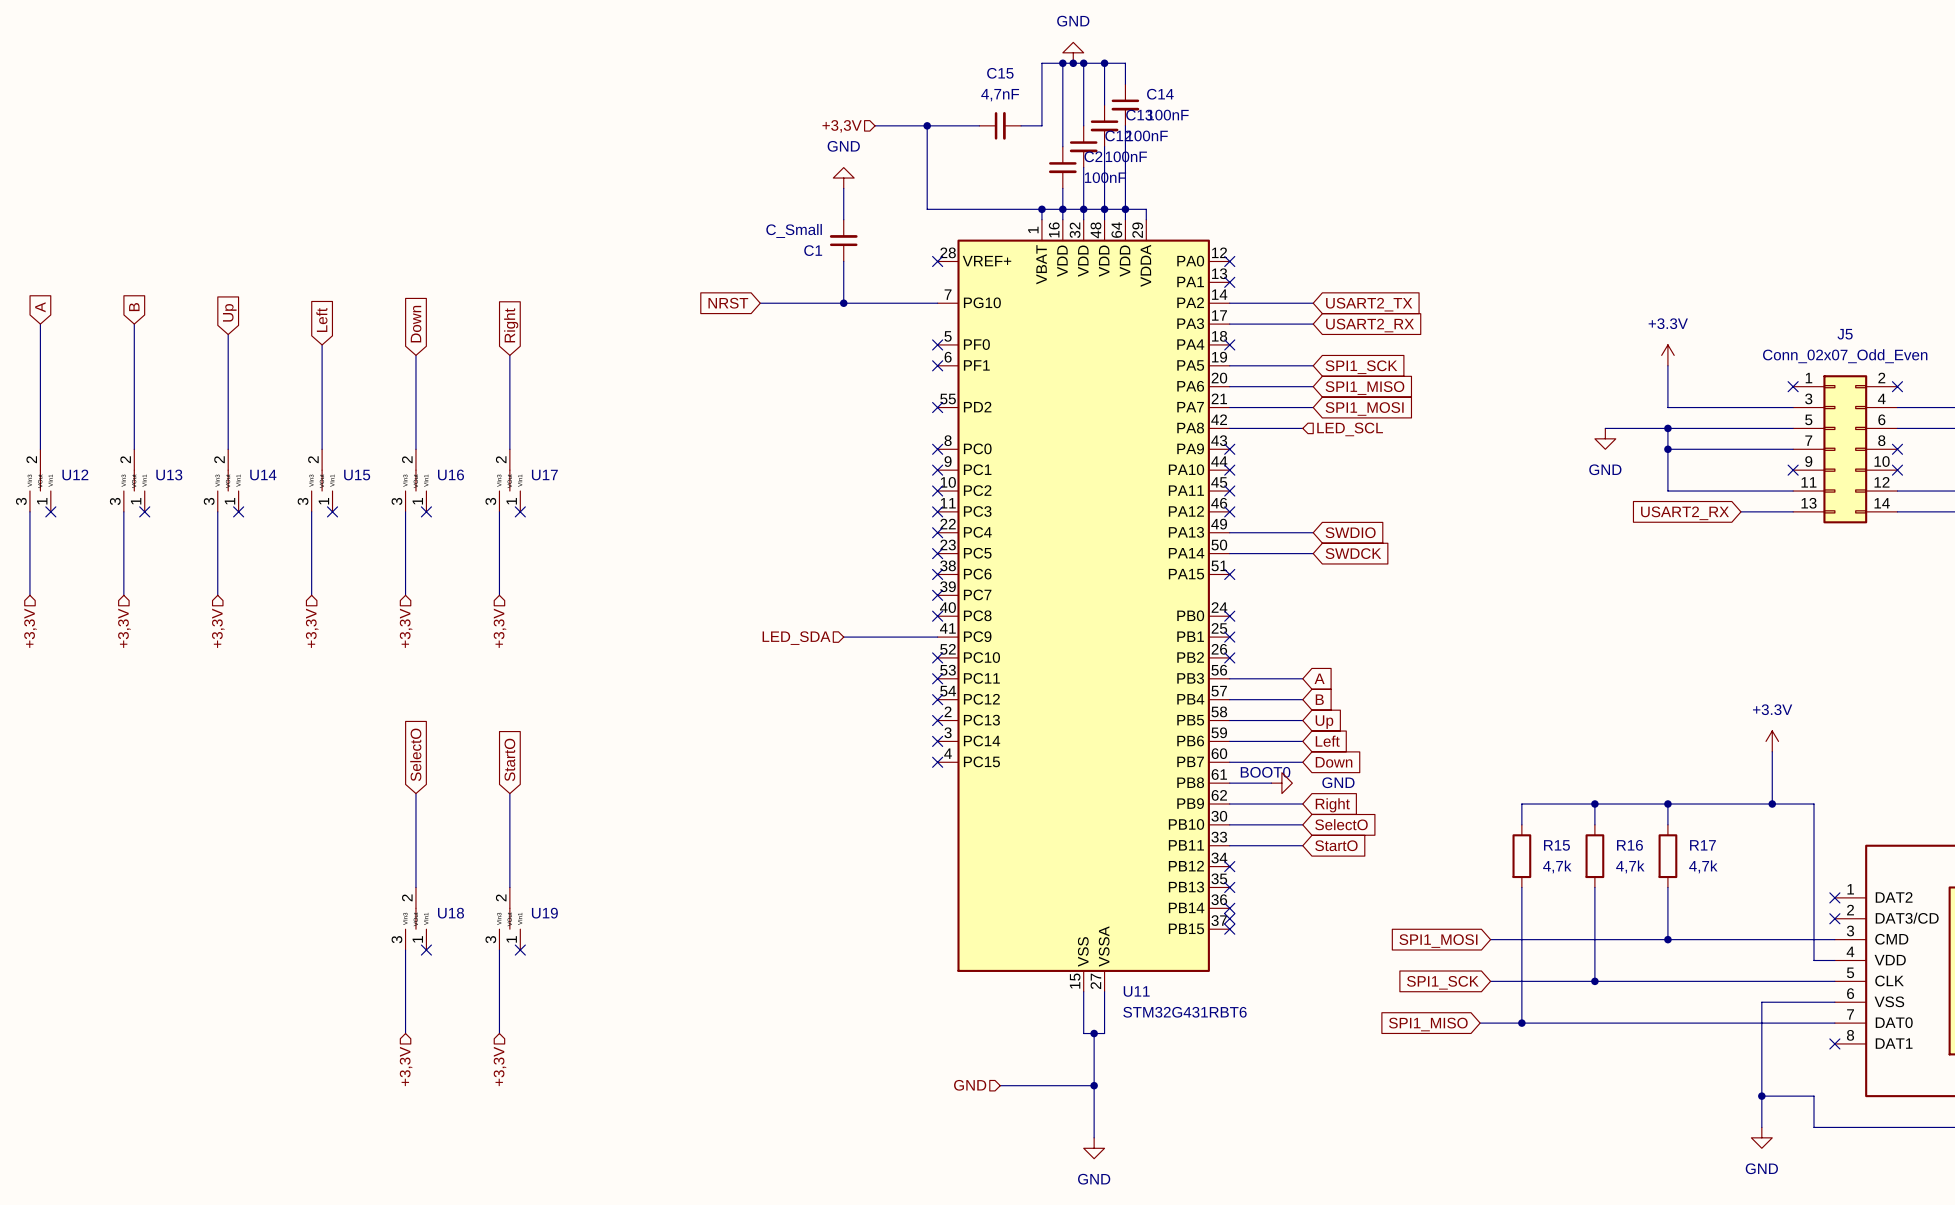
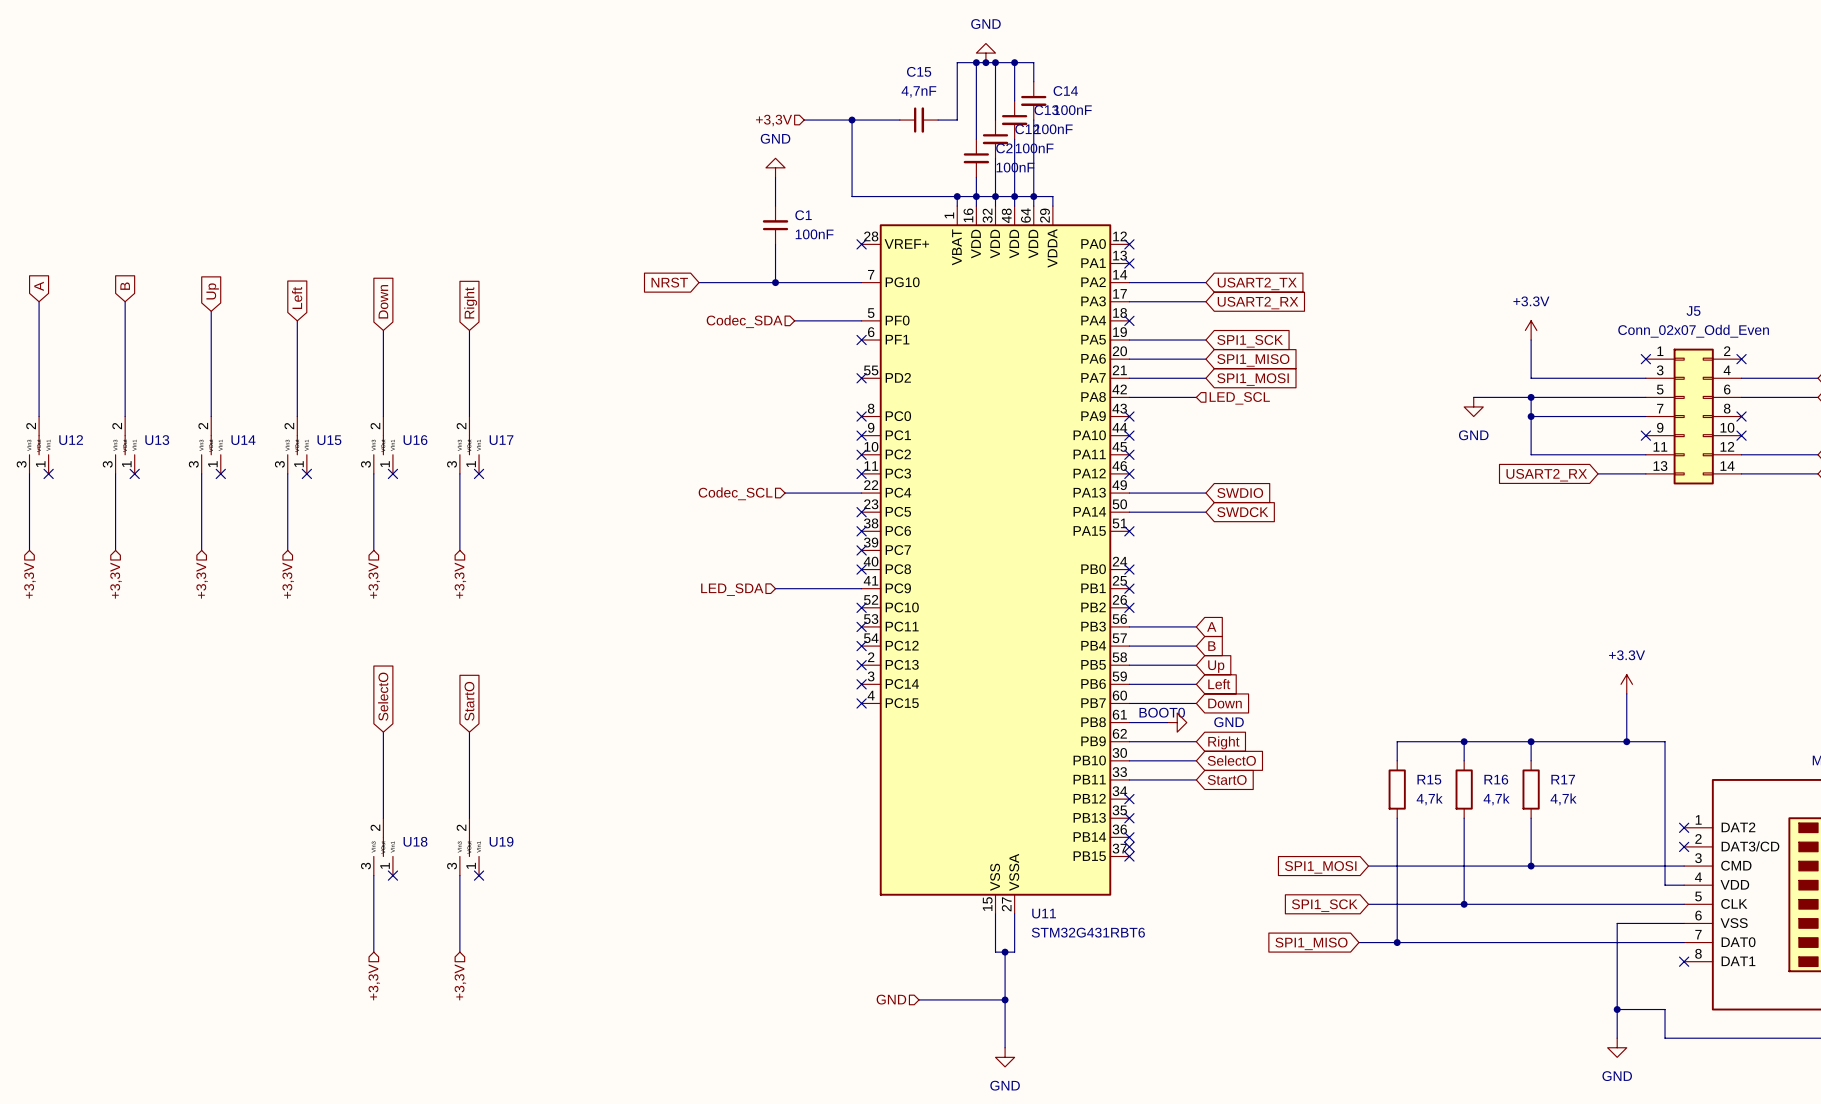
C1 value: C_Small (794, 230) -> 100nF (814, 234)
C1 name position: C1 (813, 250) -> C1 (803, 215)
wire: none -> (794, 320) (861, 320)
no-connect mark: (937, 344) -> none
hierarchical label: none -> Codec_SDA (744, 321)
wire: none -> (785, 493) (861, 493)
no-connect mark: (937, 532) -> none
hierarchical label: none -> Codec_SCL (735, 493)

